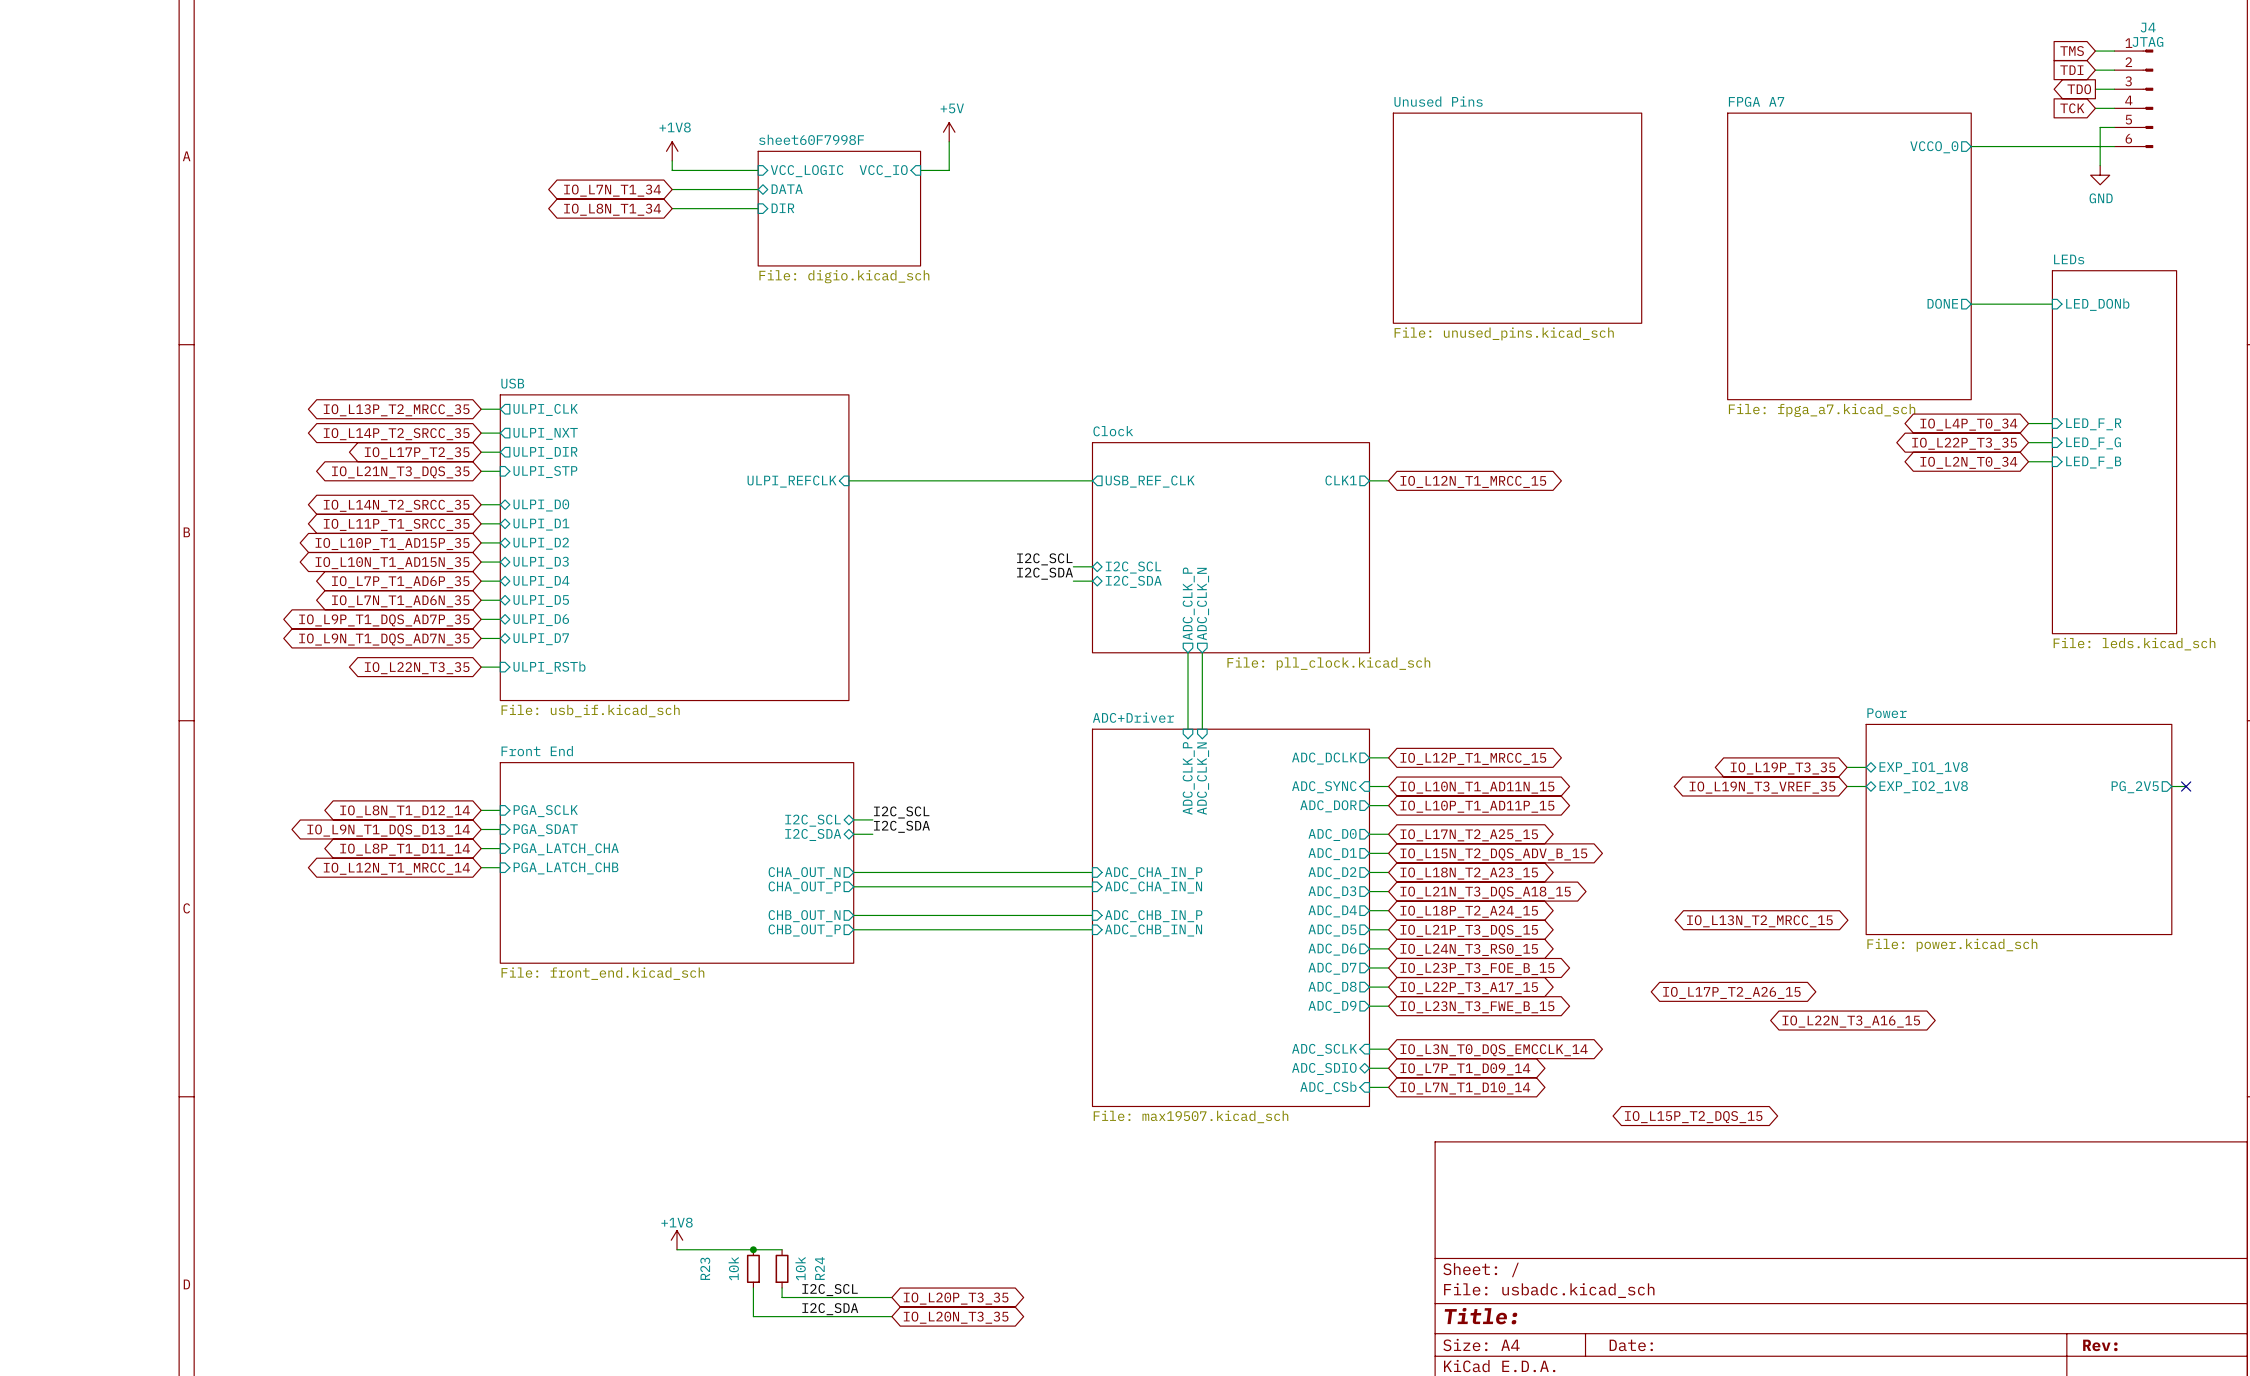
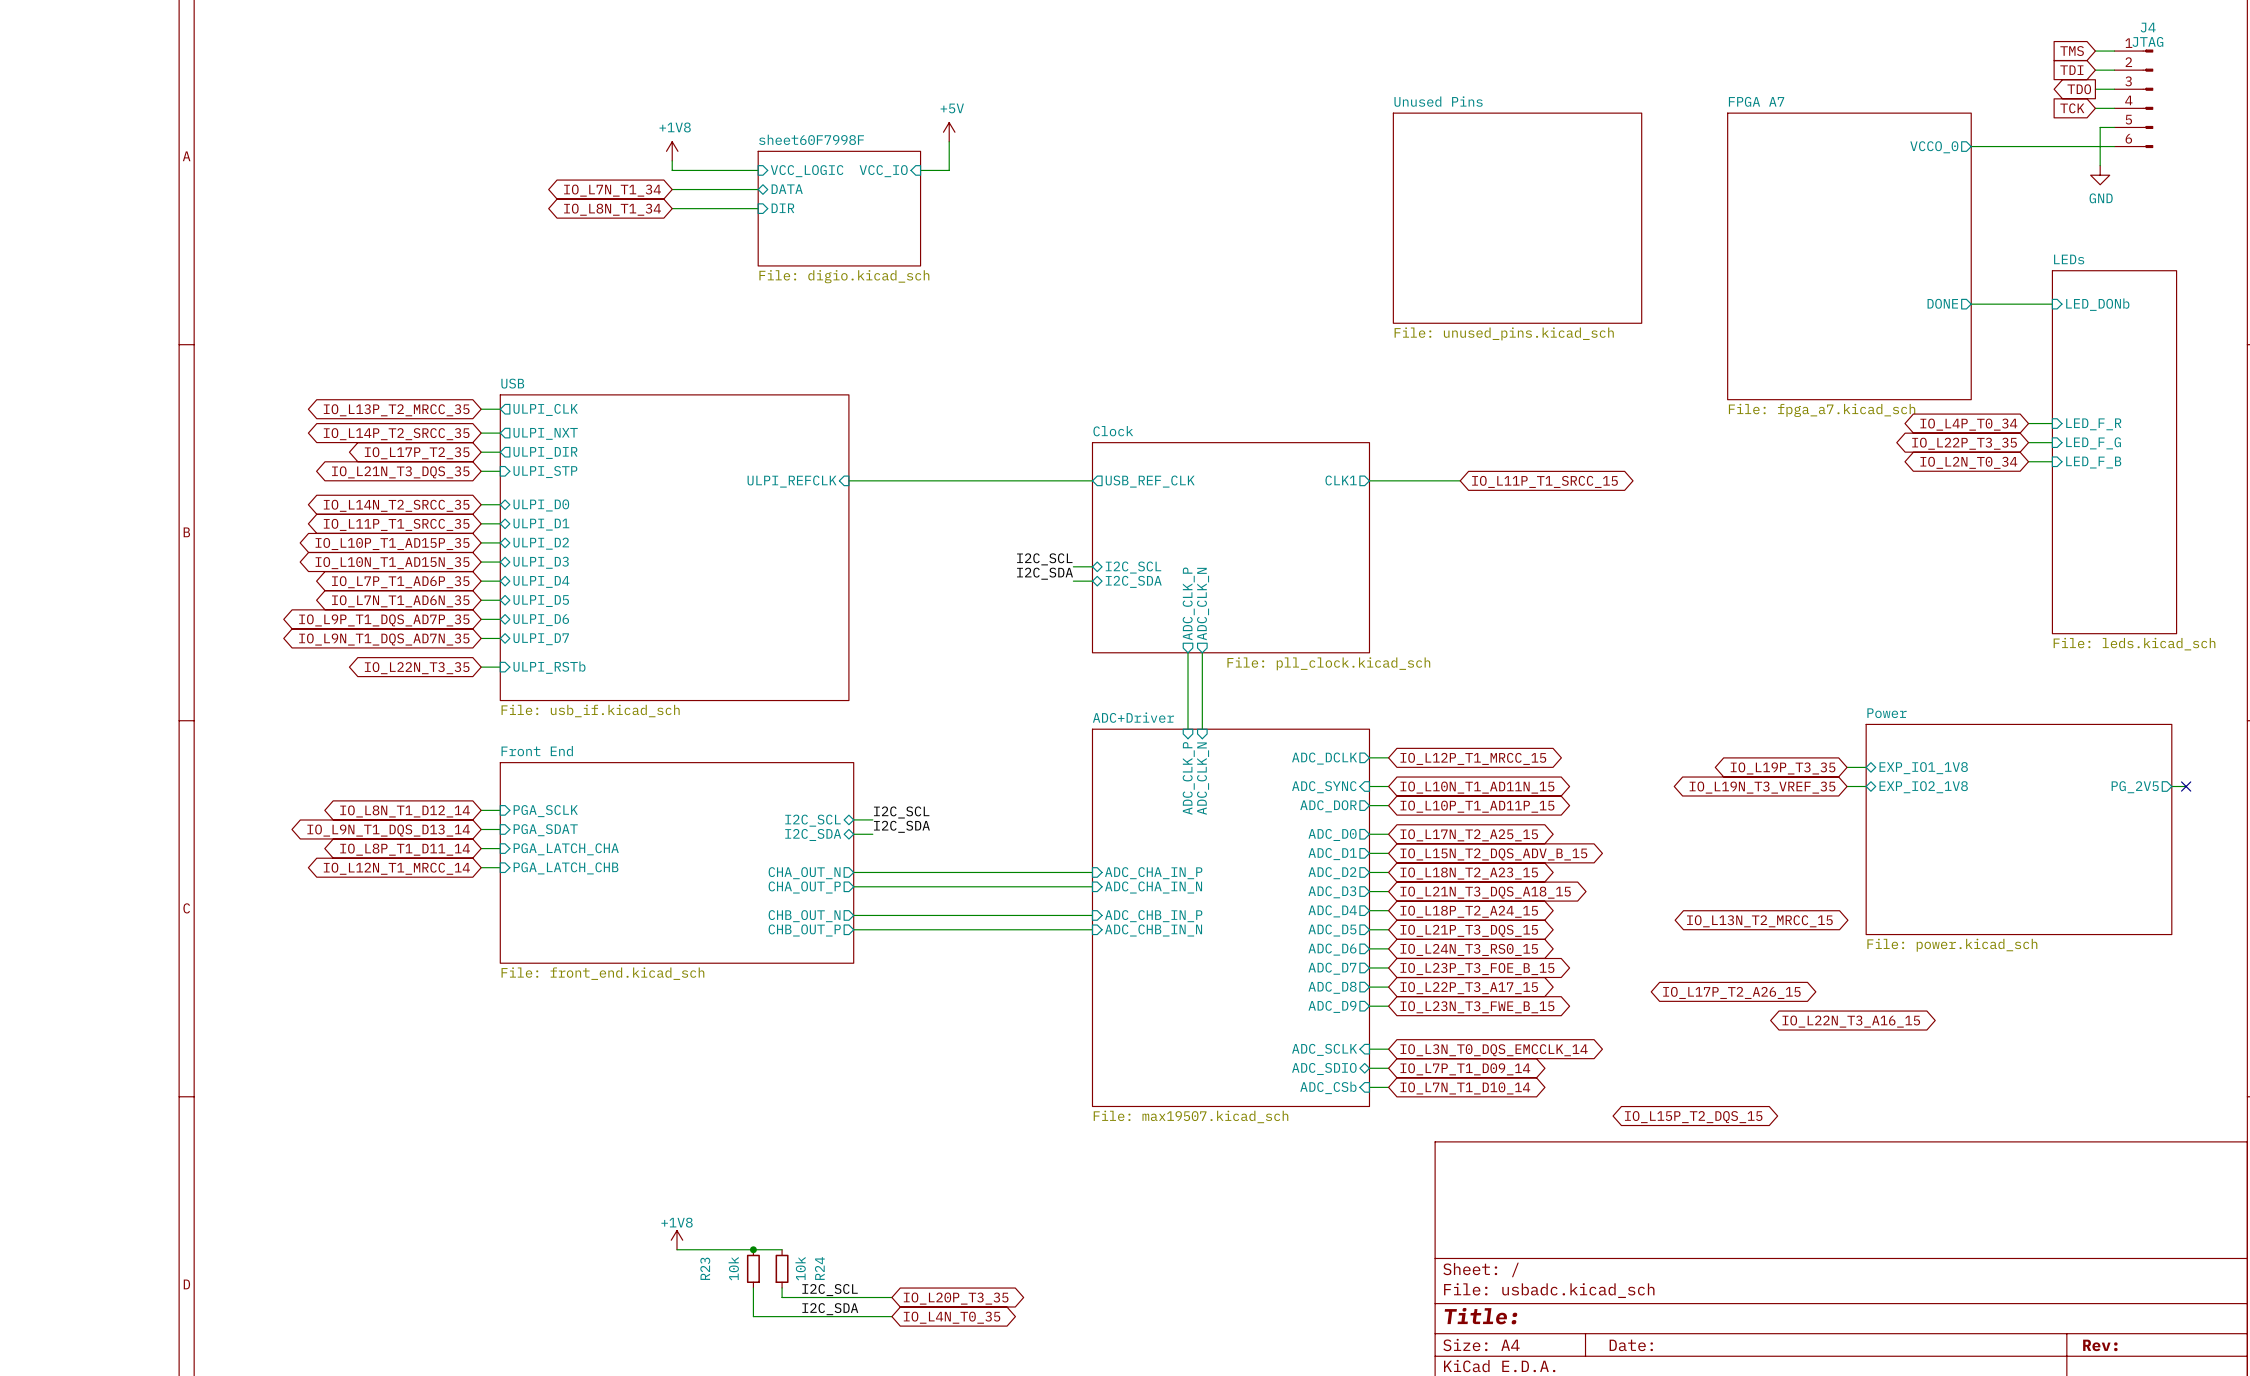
wire: none -> (1388, 480) (1460, 480)
global label: IO_L12N_T1_MRCC_15 (1473, 481) -> IO_L11P_T1_SRCC_15 (1544, 481)
global label: IO_L20N_T3_35 (956, 1317) -> IO_L4N_T0_35 (952, 1317)

